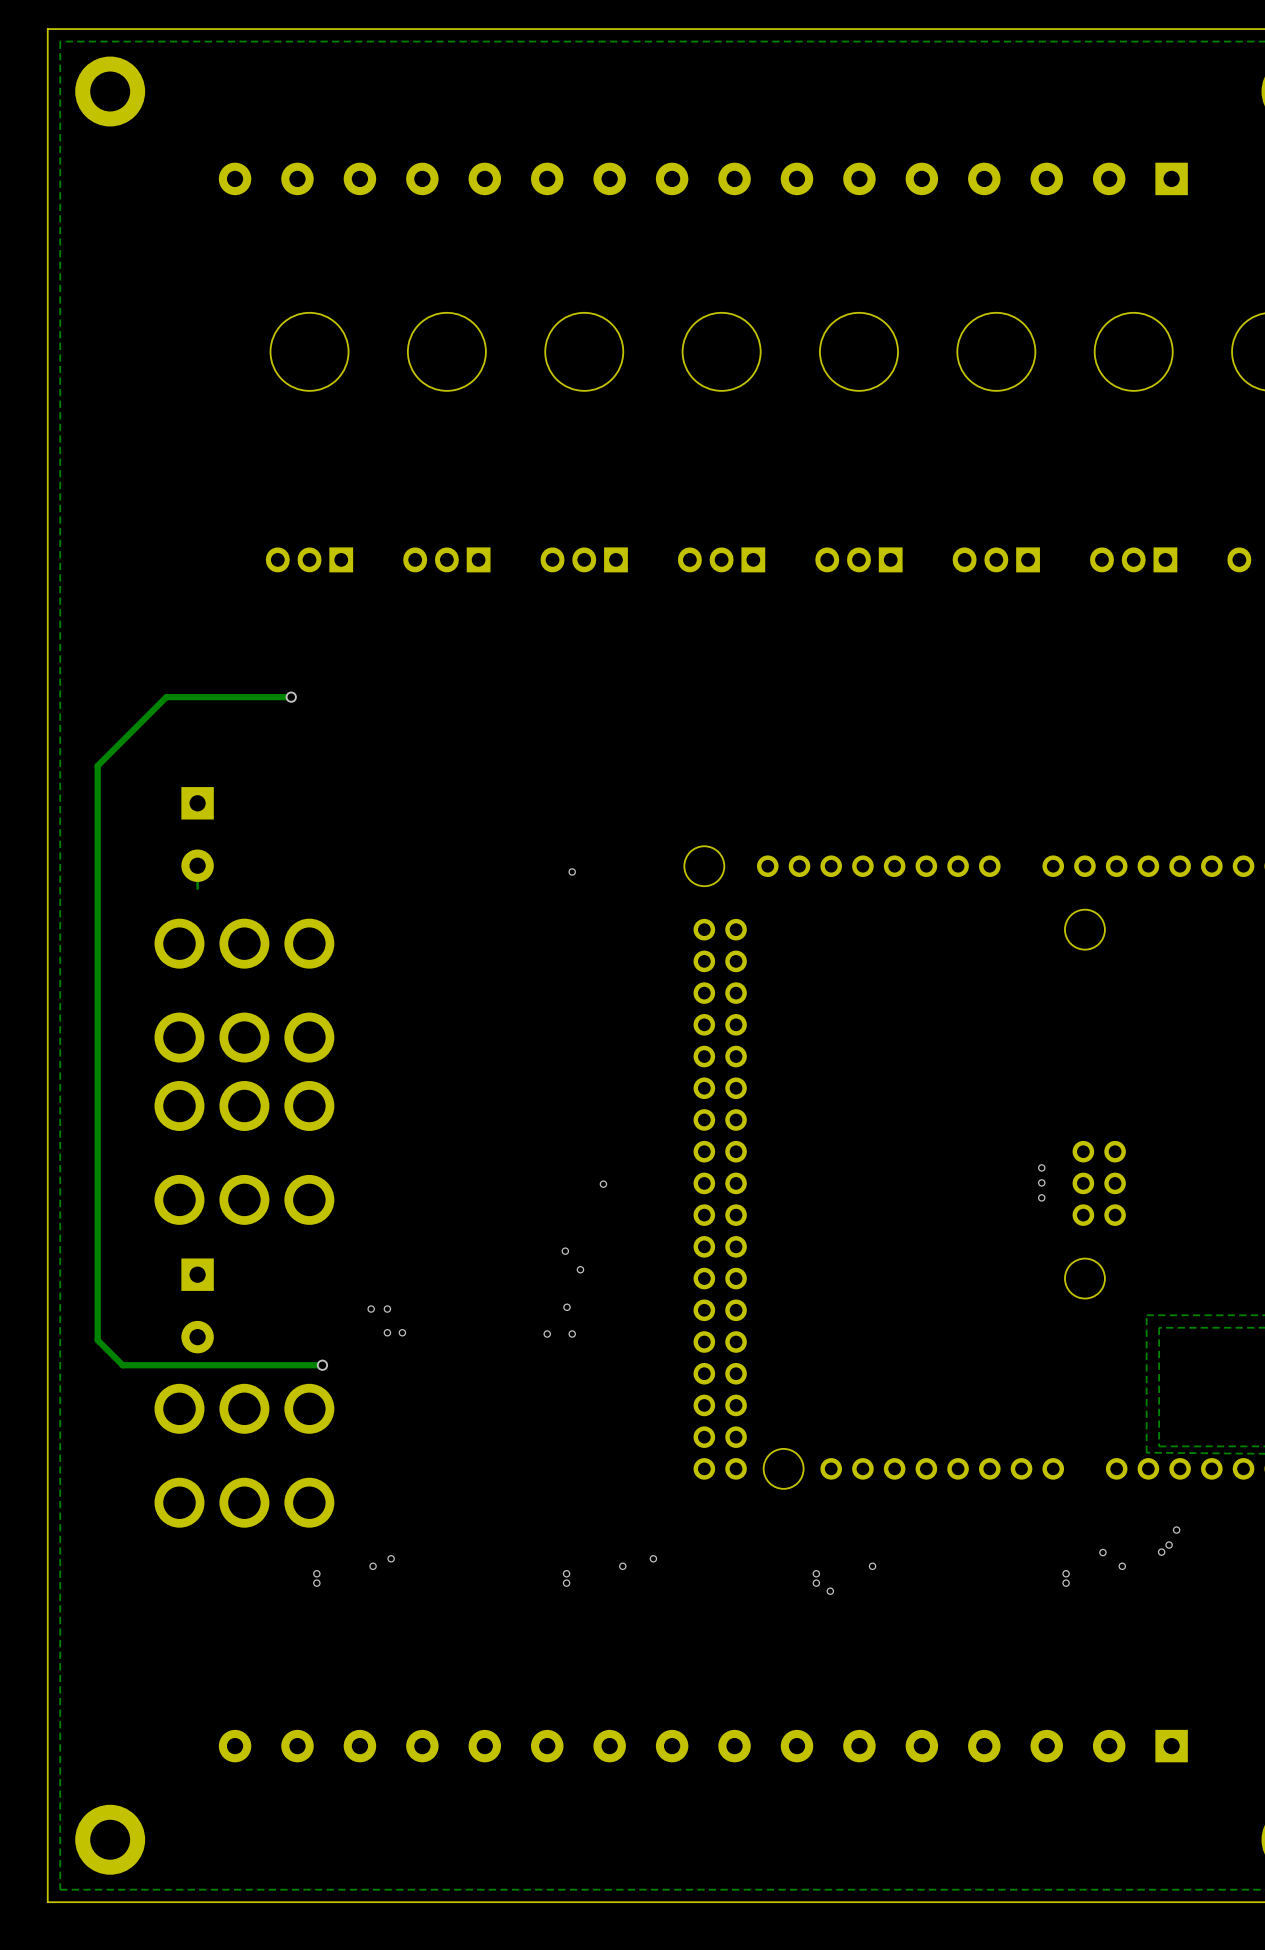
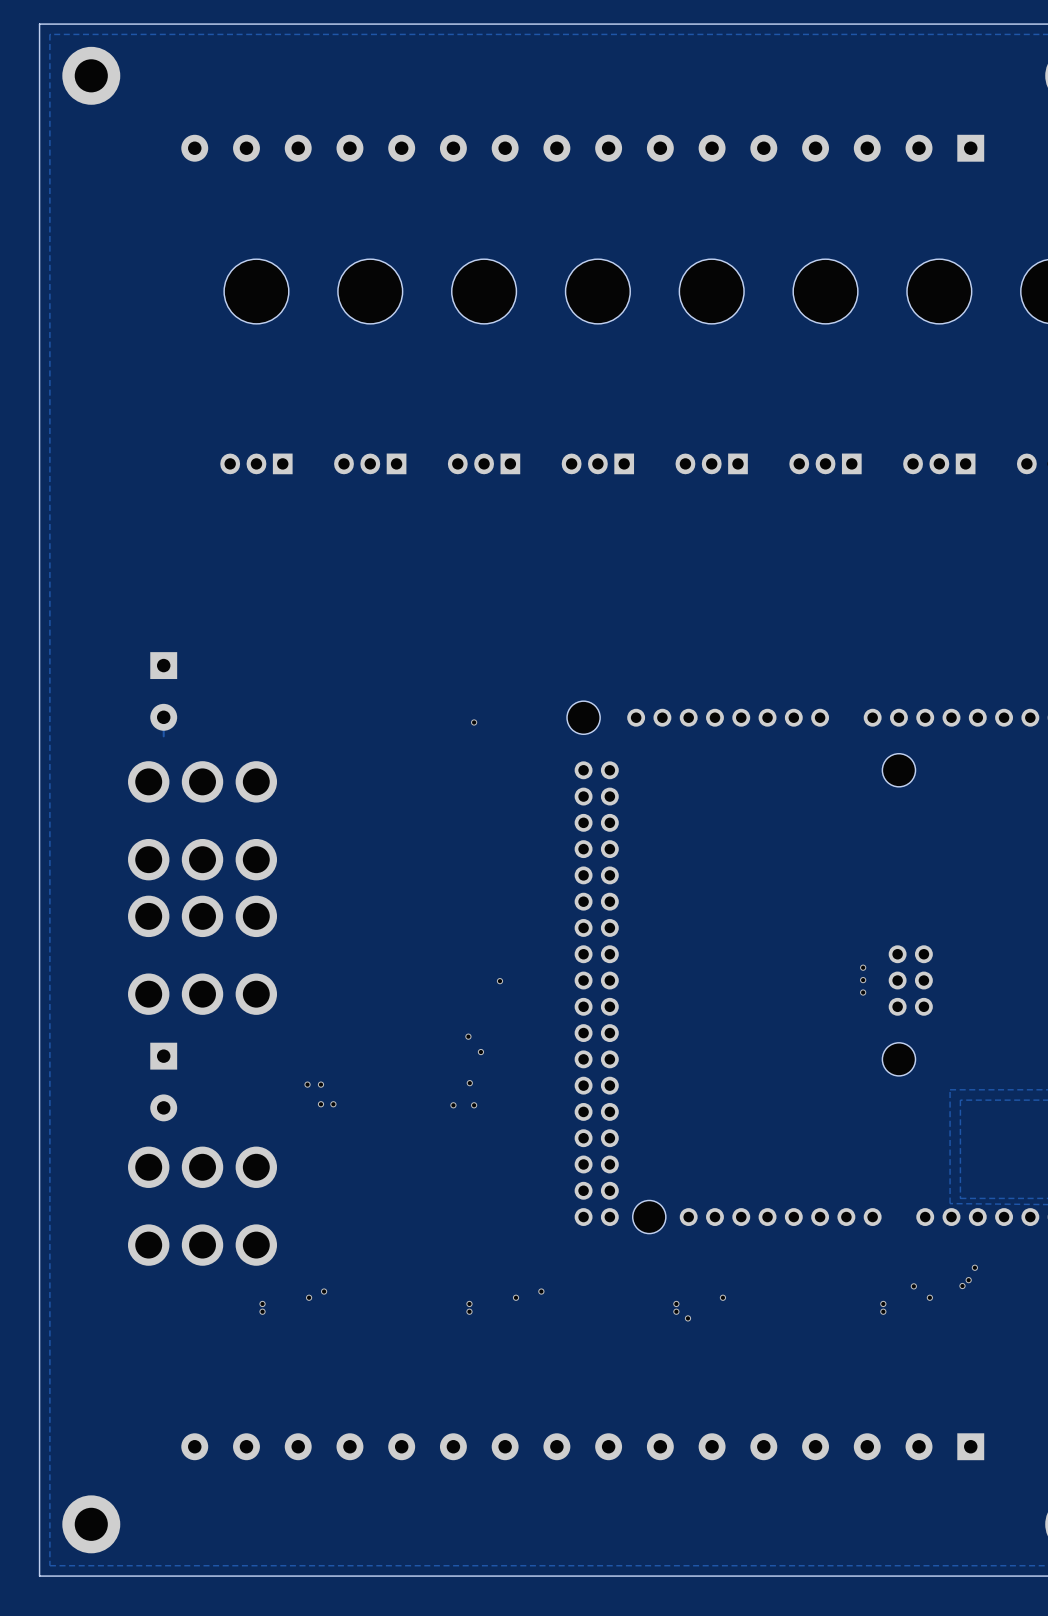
track: (291, 697) (166, 697) (97, 765) (97, 1340) (122, 1365) (322, 1365) -> none
via: (291, 697) -> none
via: (322, 1365) -> none

